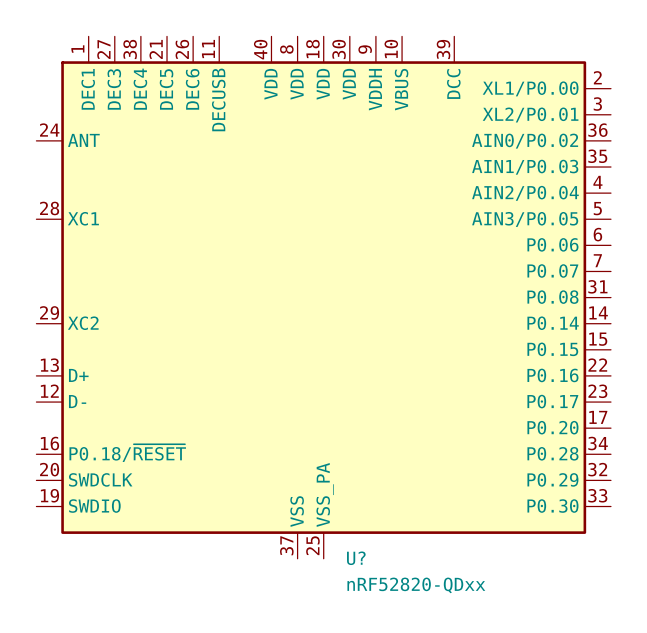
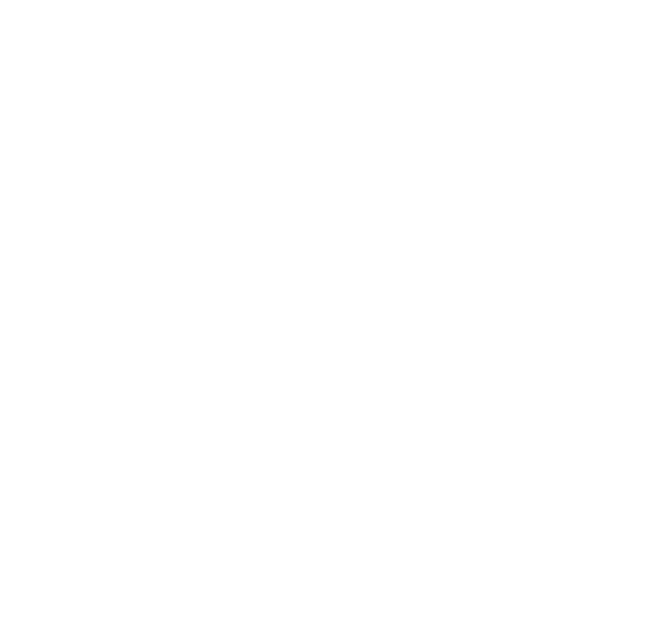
U?: nRF52820-QDxx (323, 297) -> none

